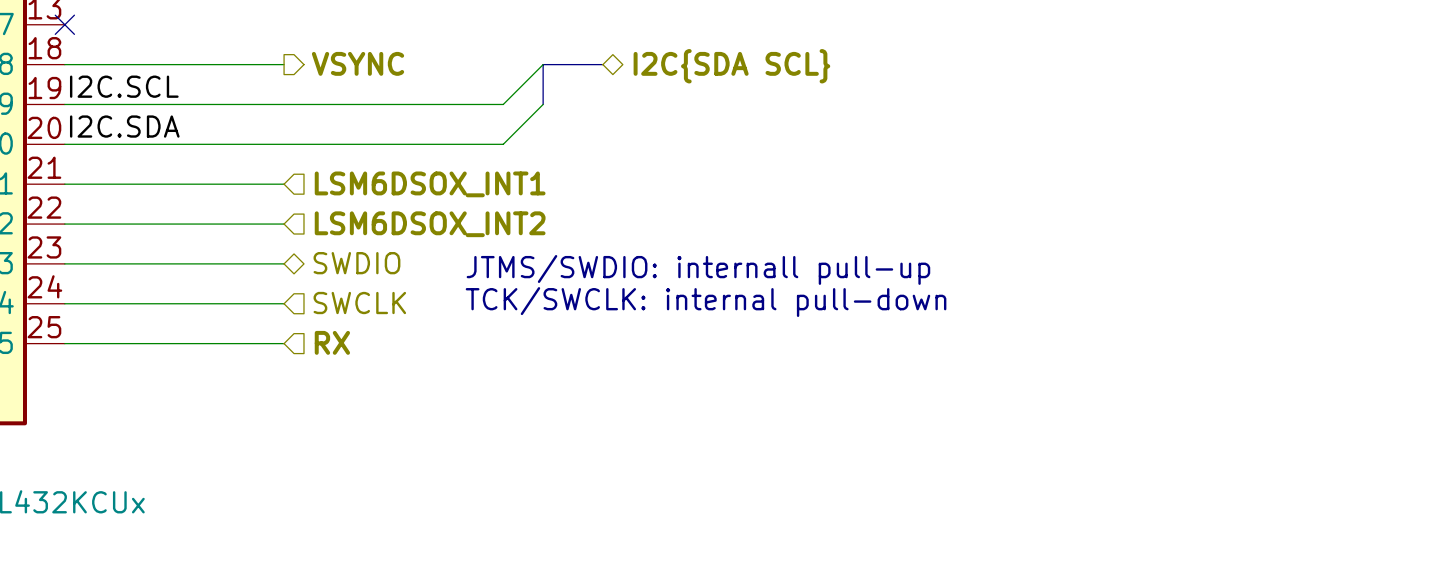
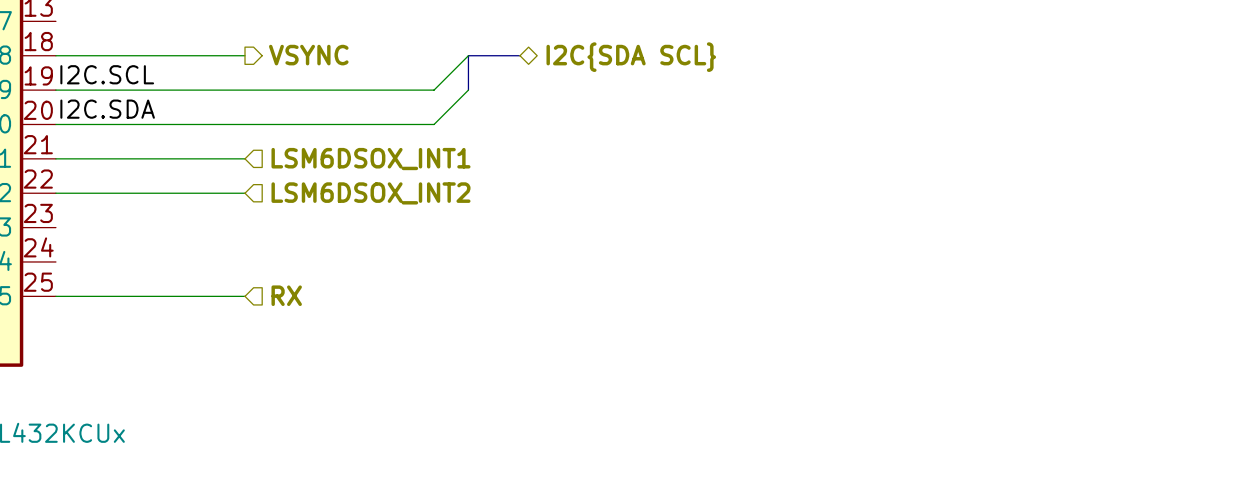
no-connect mark: (64, 24) -> none
wire: (64, 263) (284, 263) -> none
hierarchical label: SWDIO (356, 263) -> none
text: JTMS/SWDIO: internall pull-up (698, 269) -> none
text: TCK/SWCLK: internal pull-down (706, 302) -> none
wire: (64, 303) (284, 303) -> none
hierarchical label: SWCLK (359, 303) -> none

